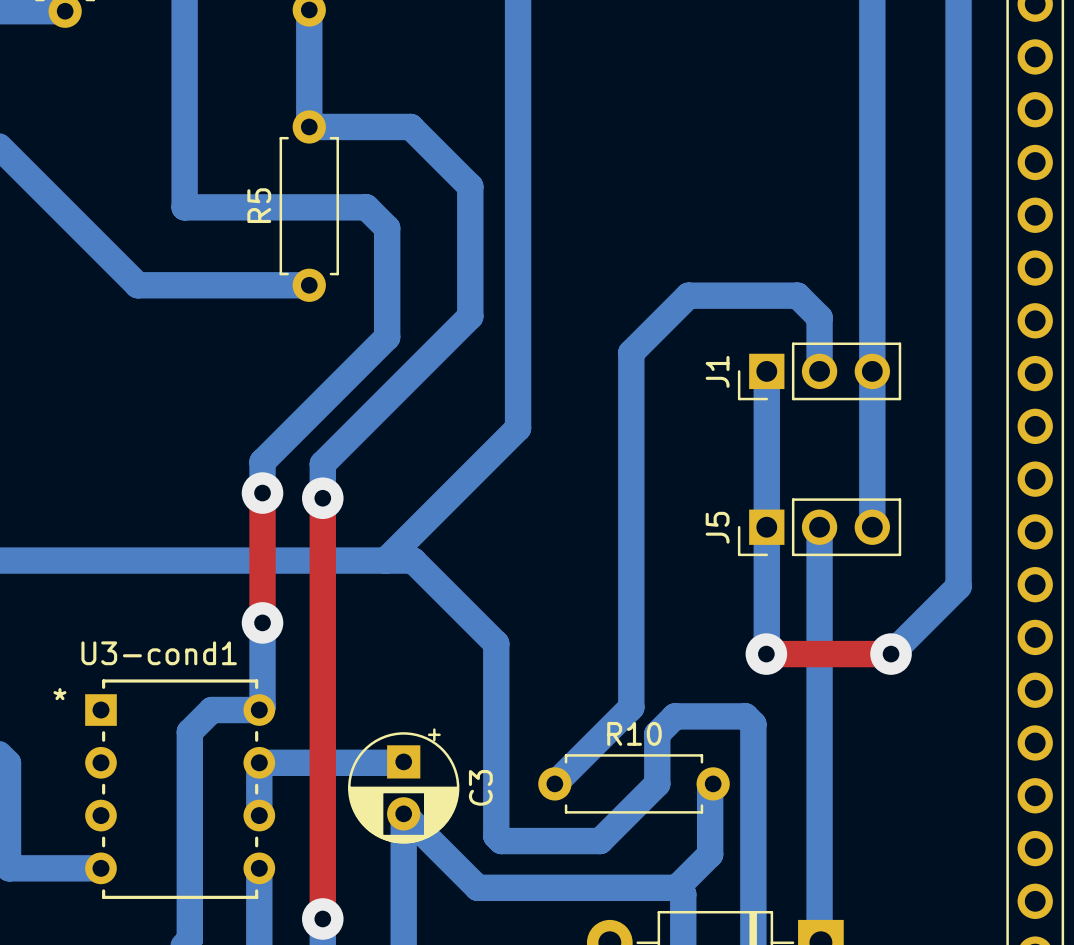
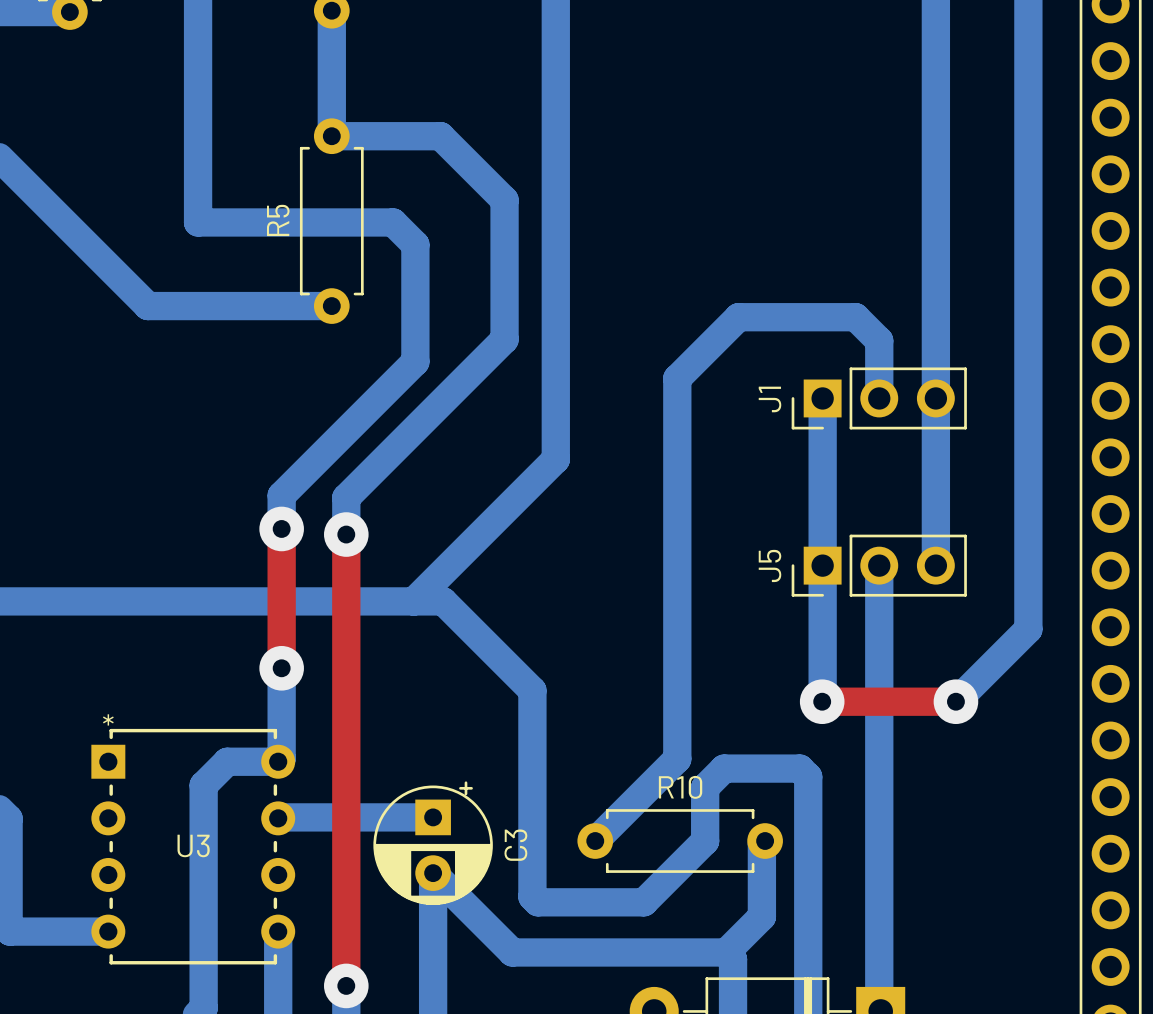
U3-cond1 name: U3-cond1 (159, 653) -> U3 (193, 845)
U3-cond1 text position: * (59, 694) -> * (108, 719)
bottom track: (403, 761) (259, 762) (259, 815) -> (433, 817) (279, 817)

